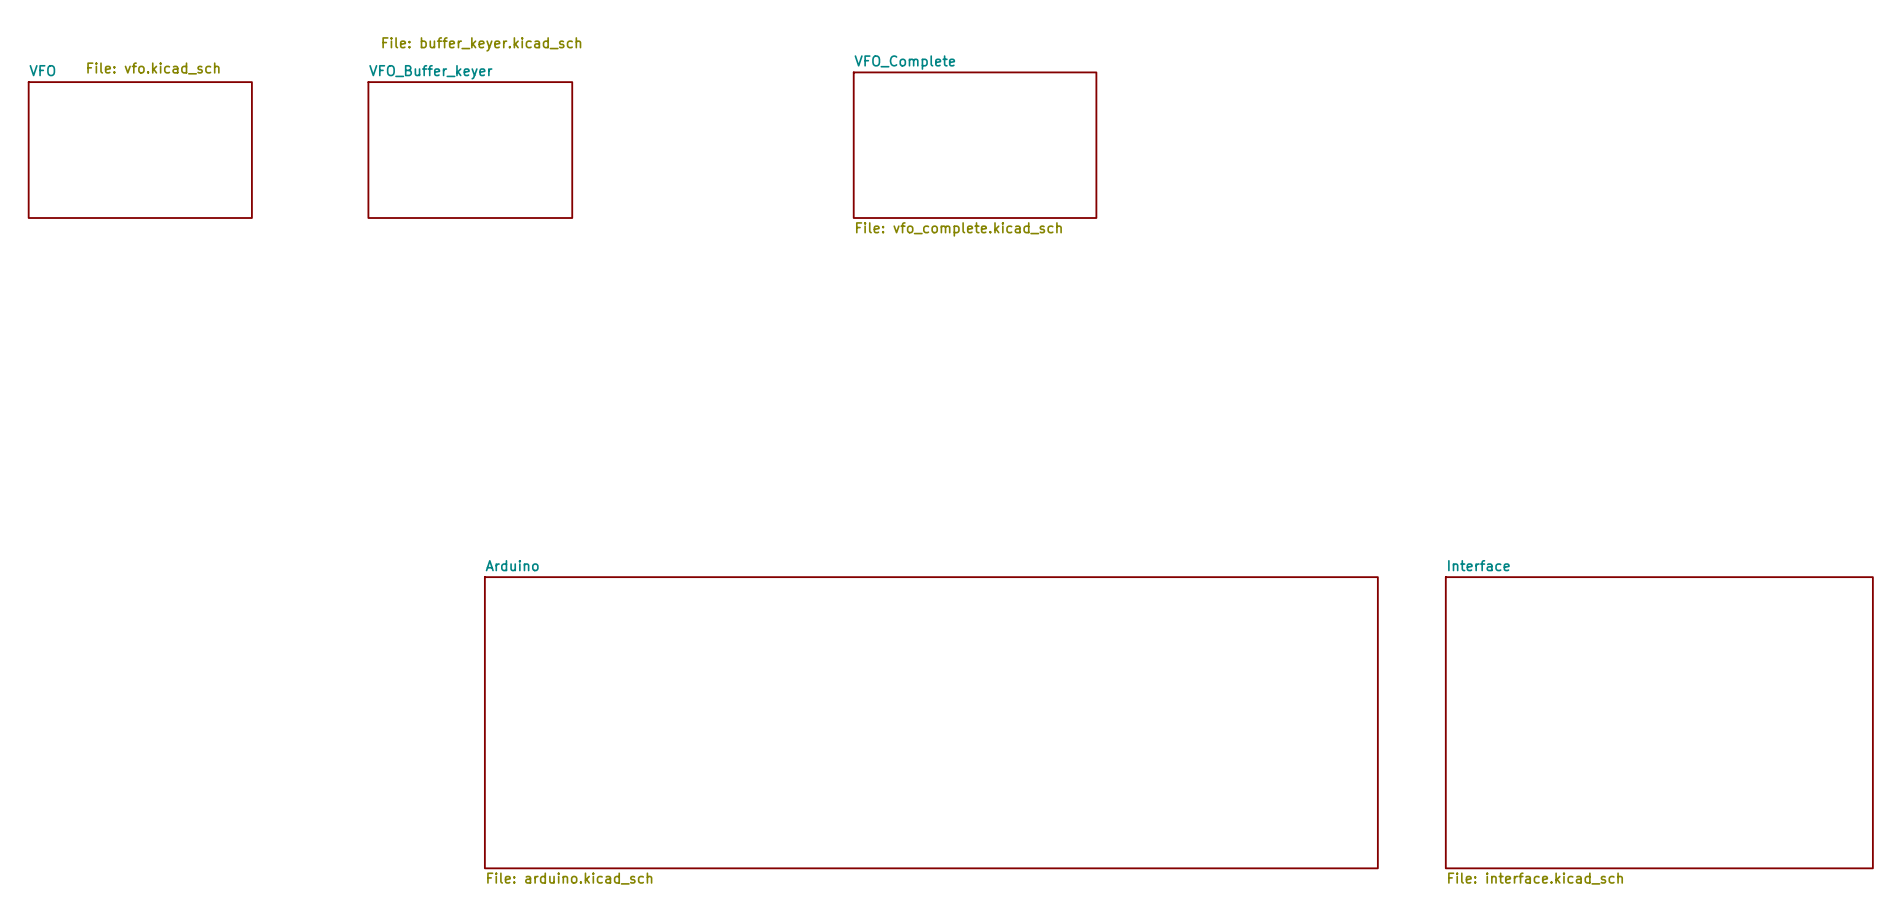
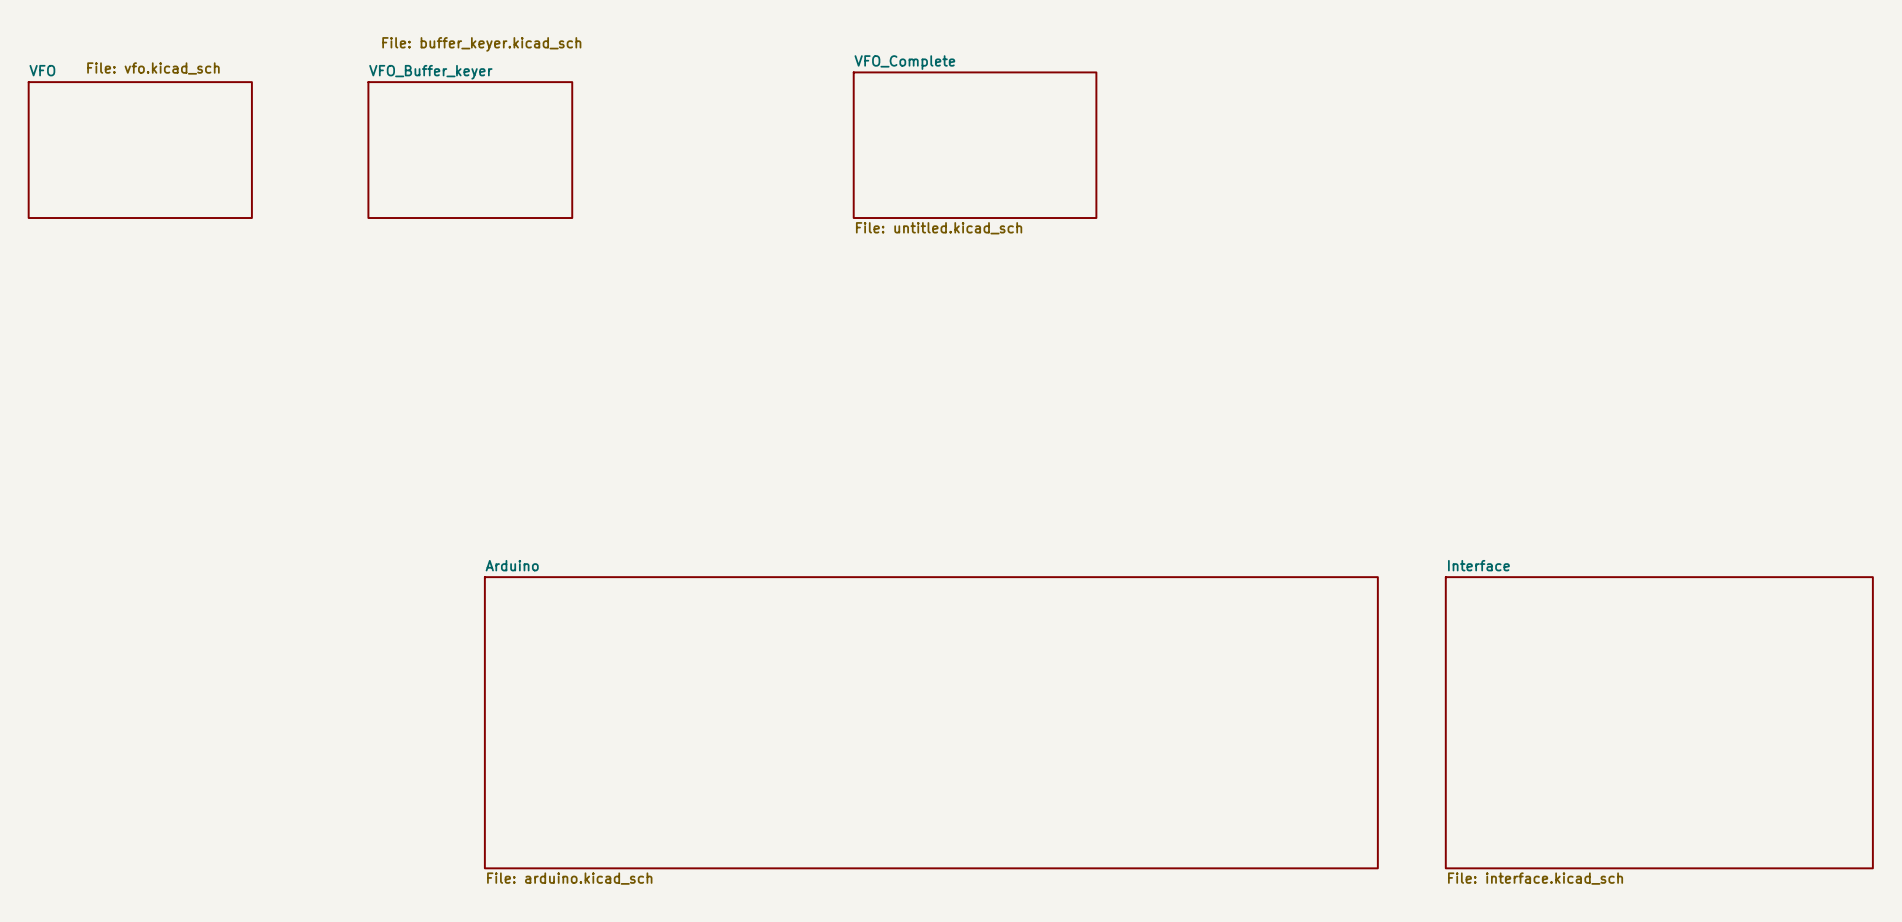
sheet VFO_Complete value: File: vfo_complete.kicad_sch (958, 229) -> File: untitled.kicad_sch (939, 228)

